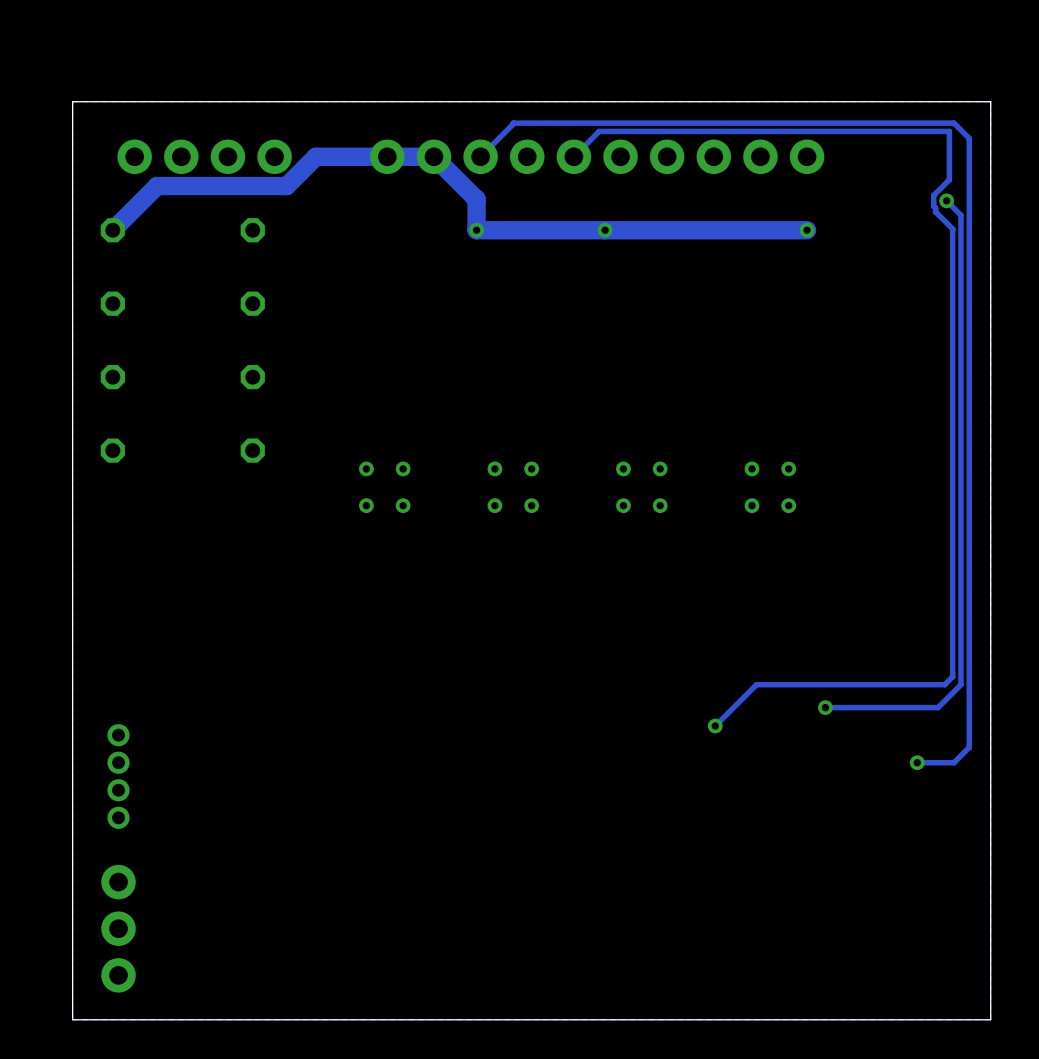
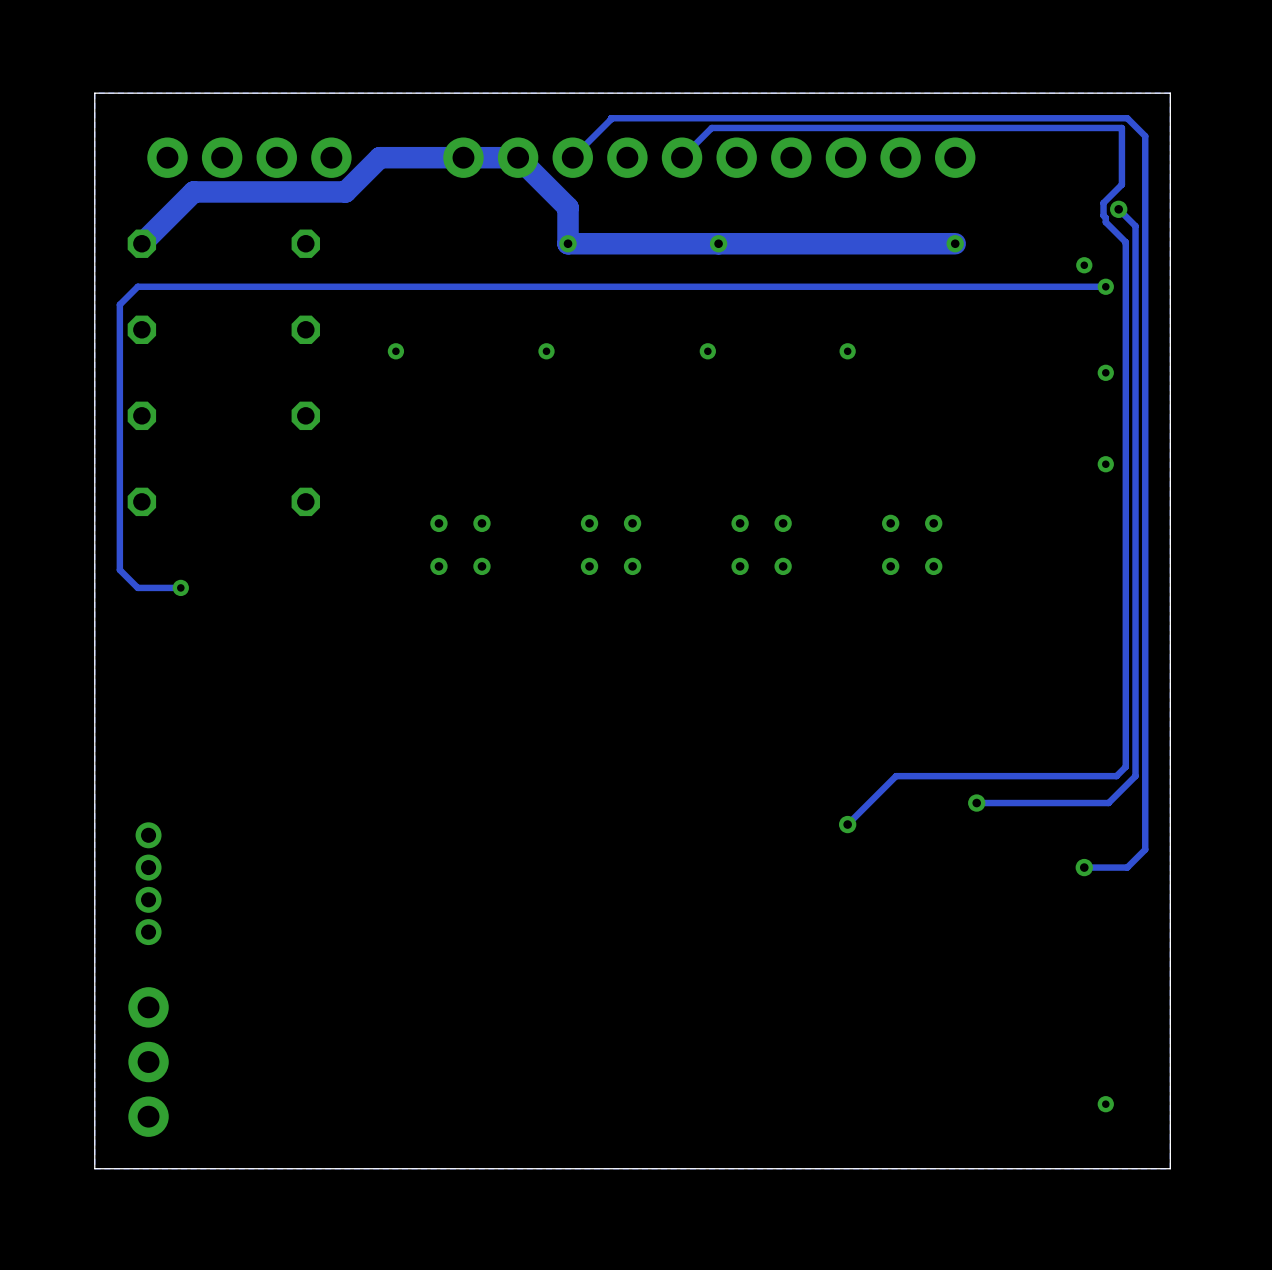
via: none -> (1084, 265)
track: none -> (1105, 286) (137, 286) (119, 304) (119, 569) (137, 587) (180, 587)
via: none -> (1105, 286)
via: none -> (395, 351)
via: none -> (546, 351)
via: none -> (707, 351)
via: none -> (847, 351)
via: none -> (1105, 372)
via: none -> (1105, 464)
via: none -> (180, 587)
via: none -> (1105, 1104)

